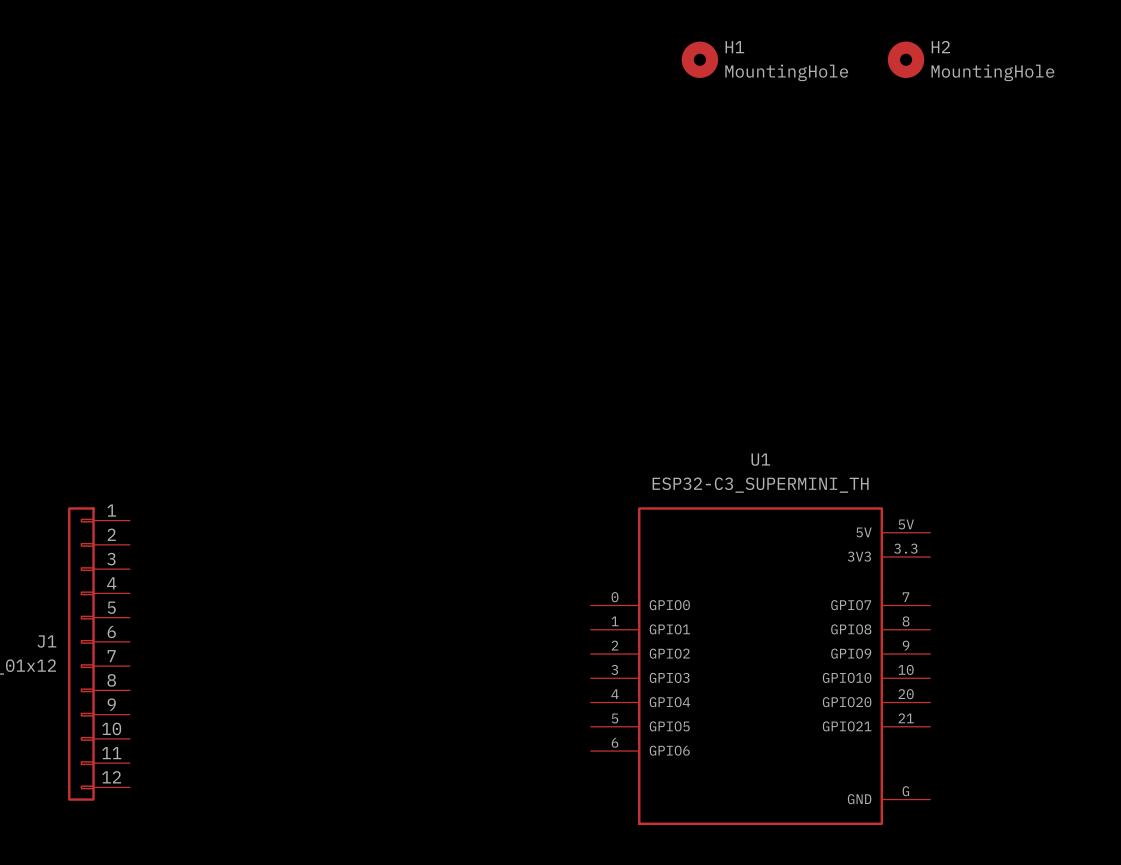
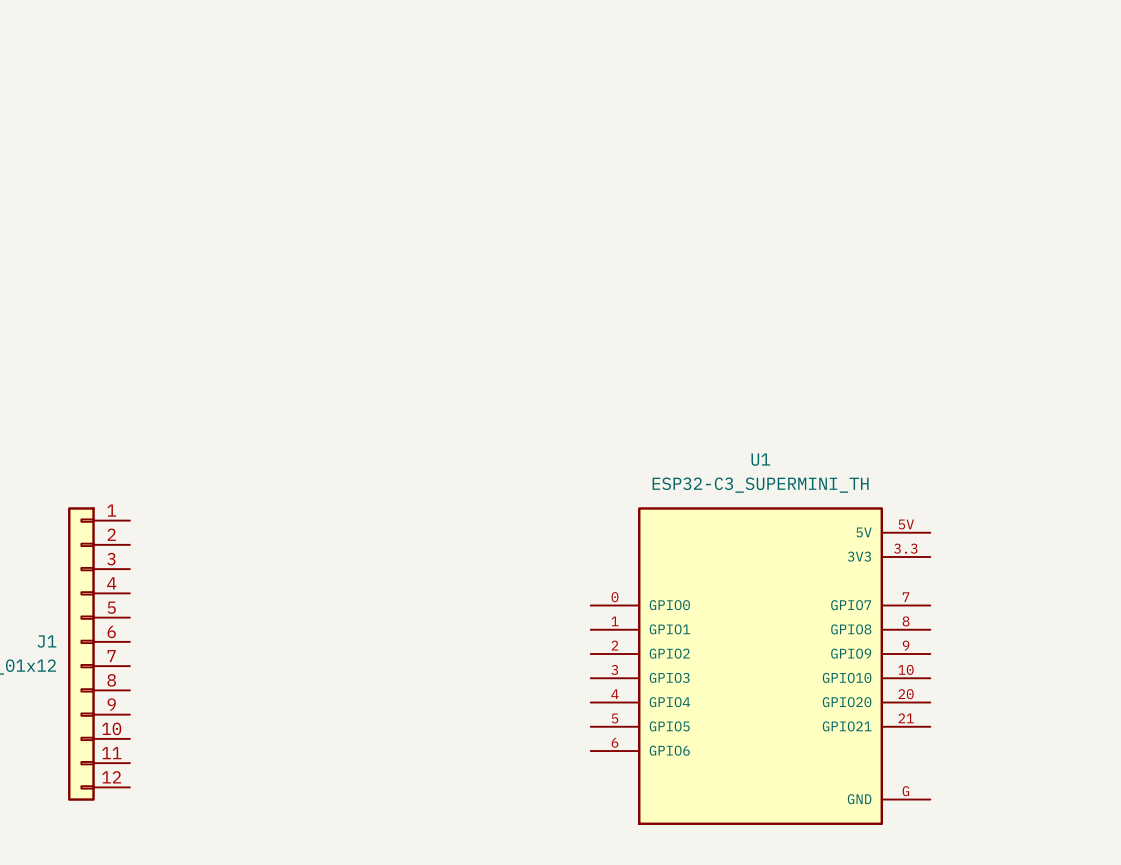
H1: MountingHole (699, 59) -> none
H2: MountingHole (906, 59) -> none

